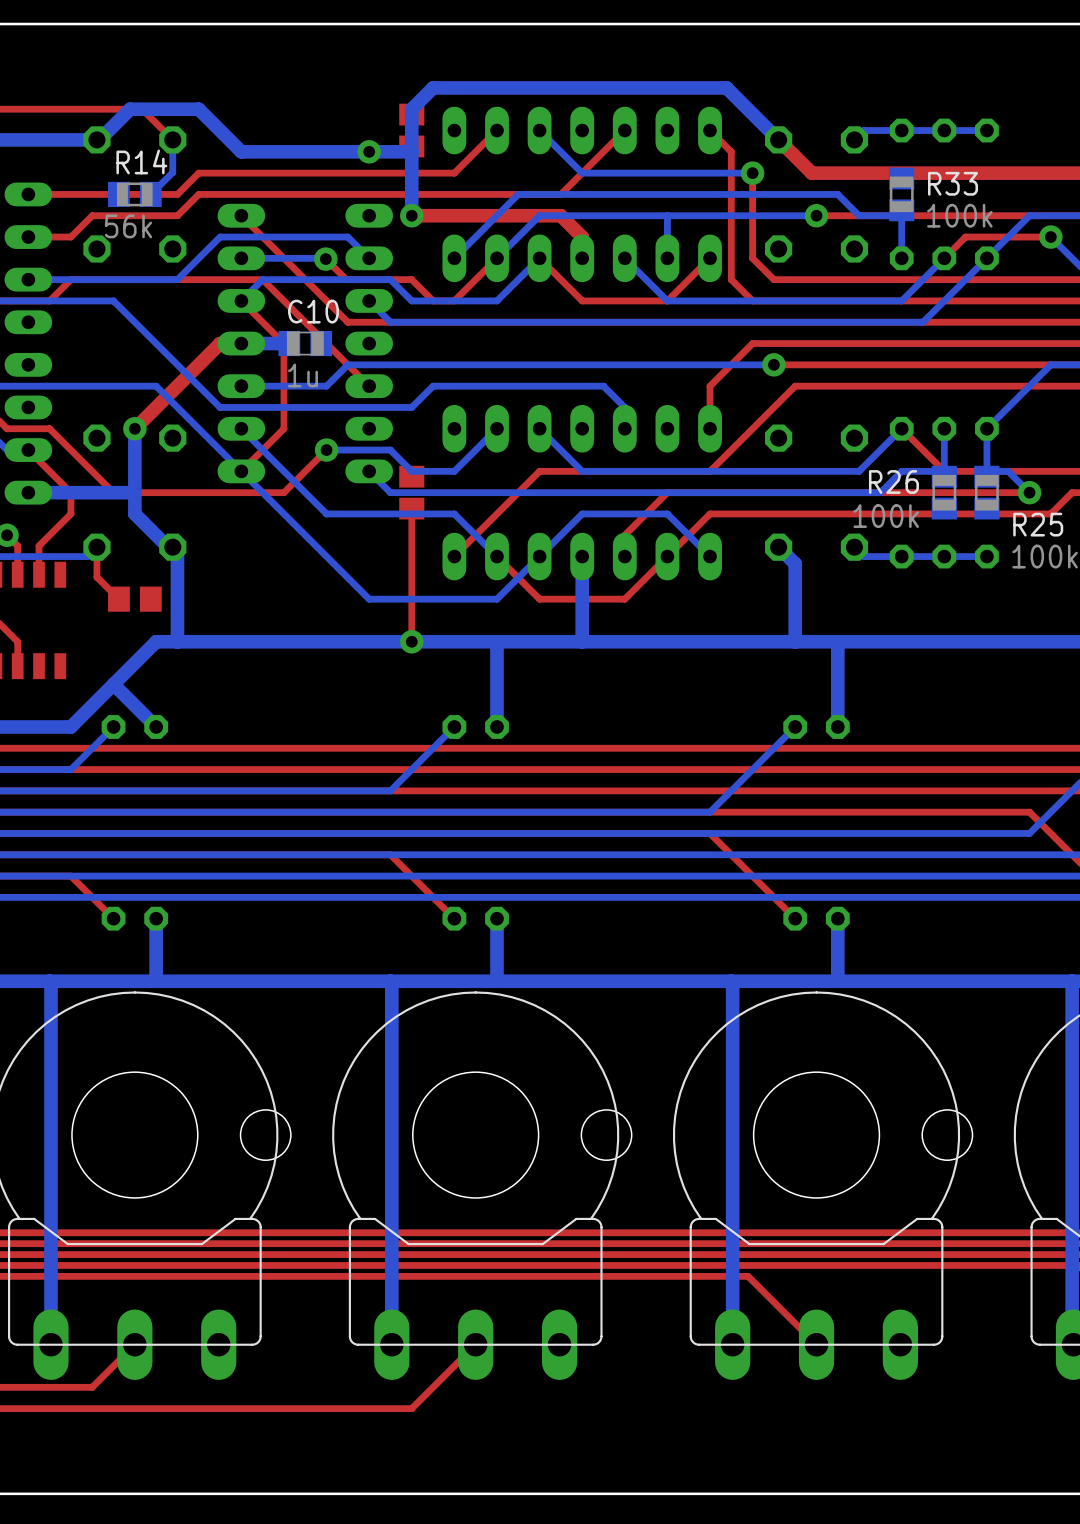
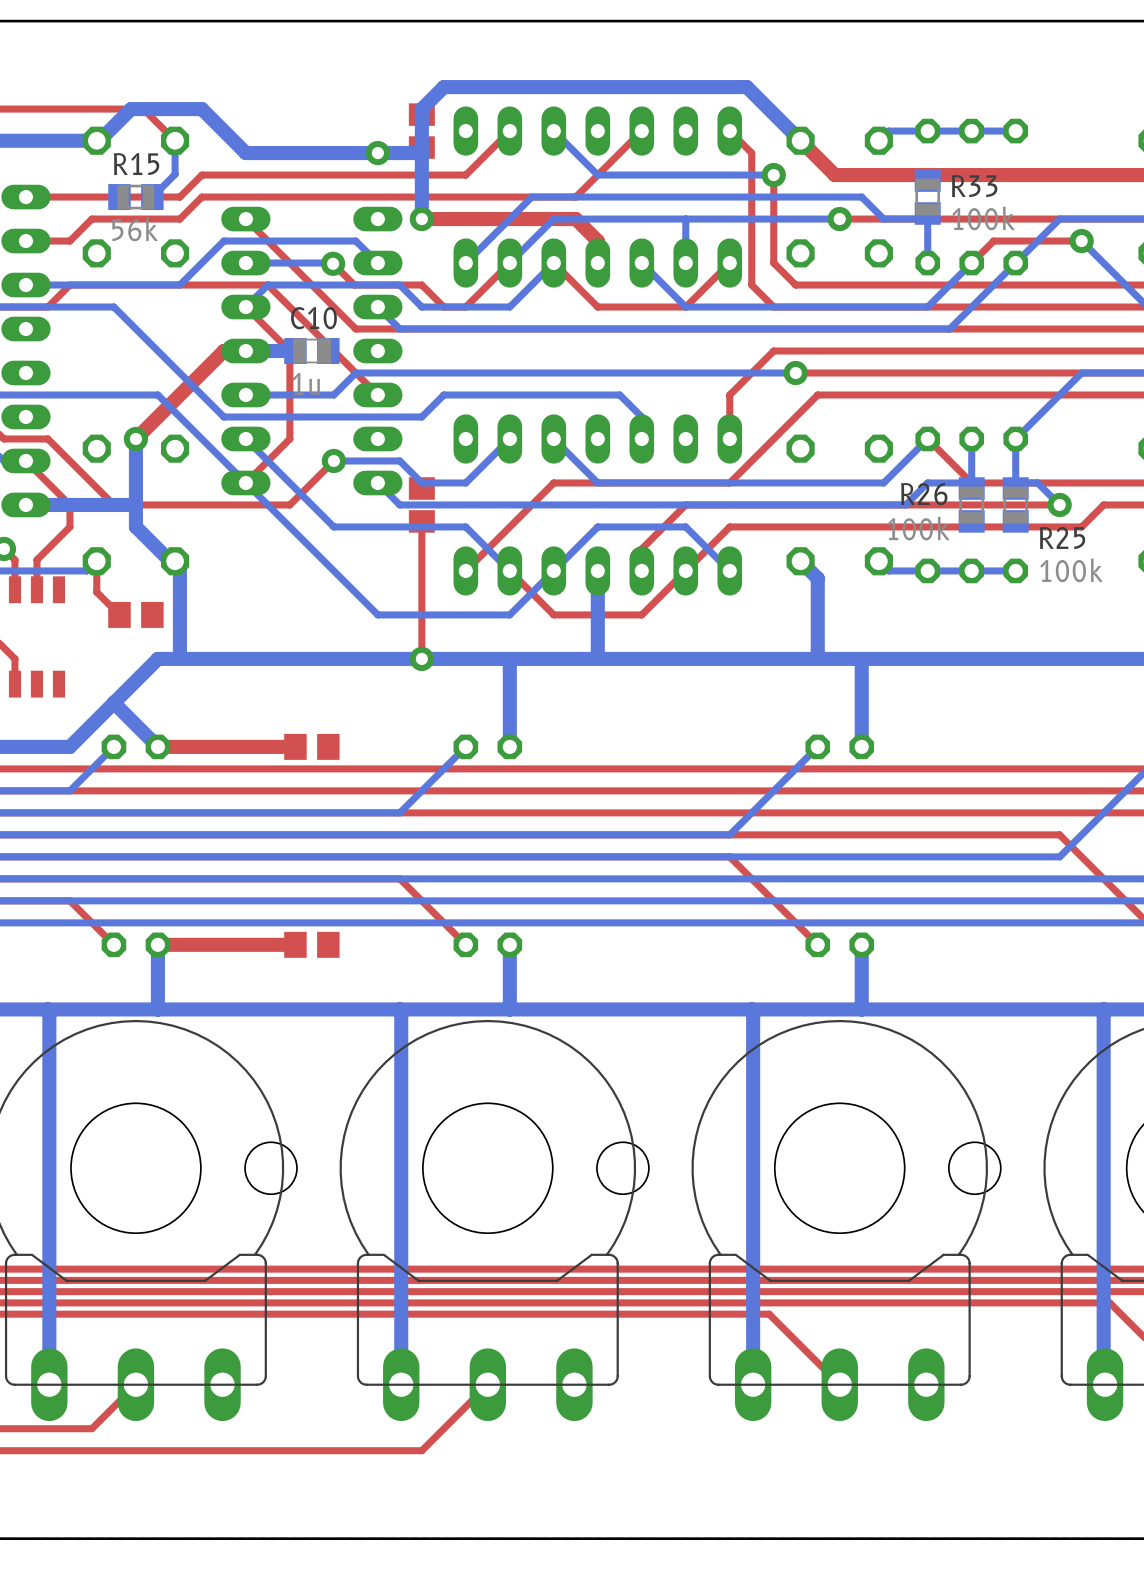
R14 name: R14 (141, 161) -> R15 (136, 164)
top track: none -> (295, 746) (157, 746)
part: none -> (311, 746)
top track: none -> (295, 944) (157, 944)
part: none -> (311, 944)

